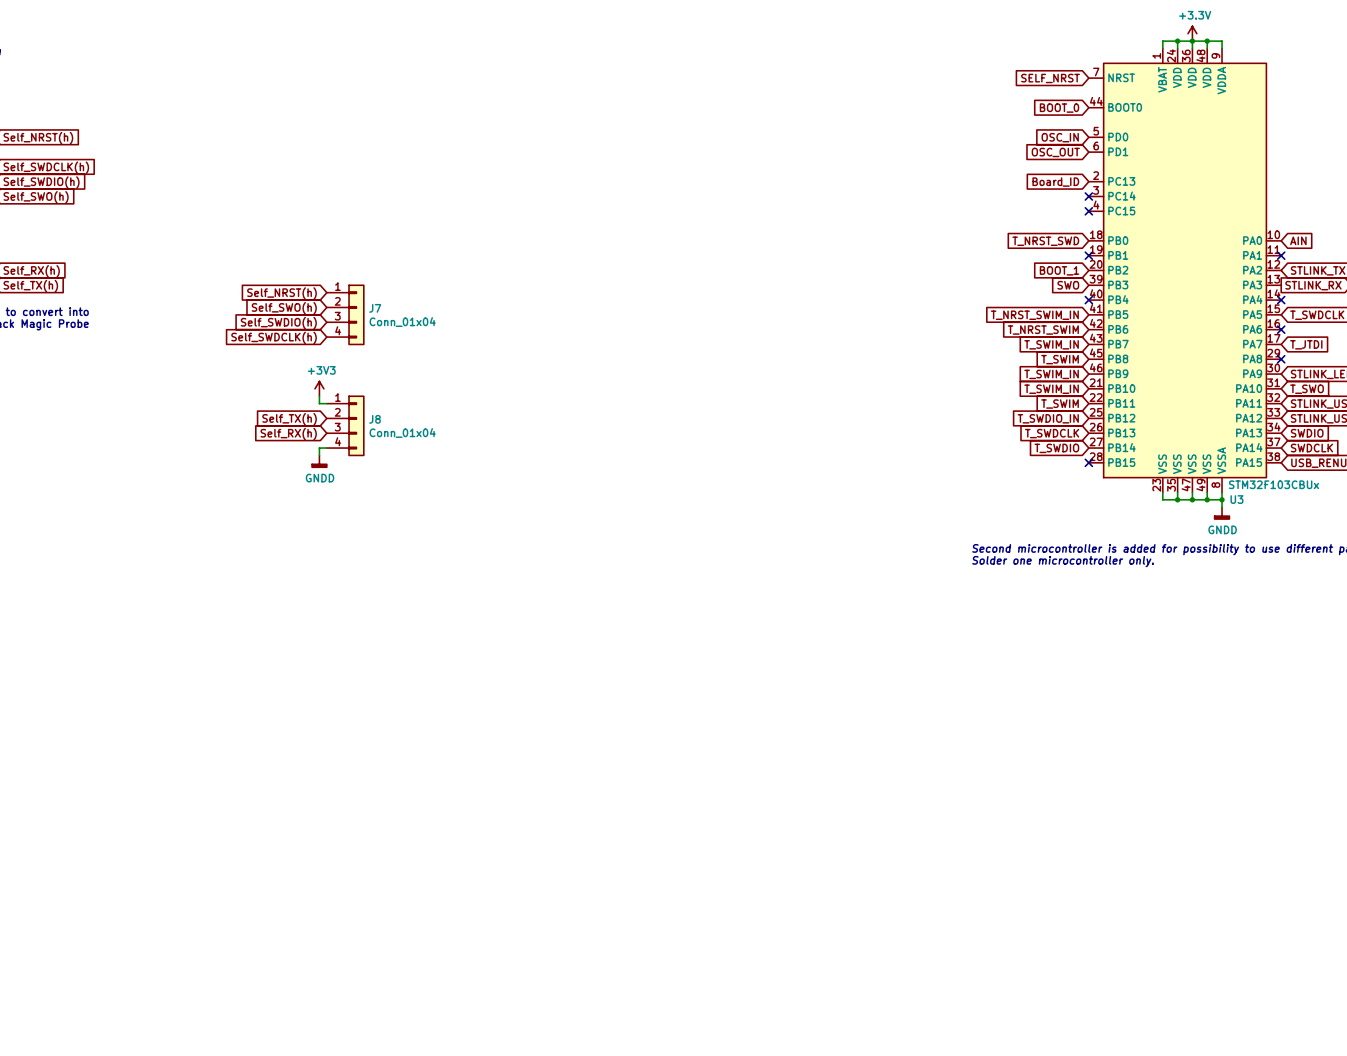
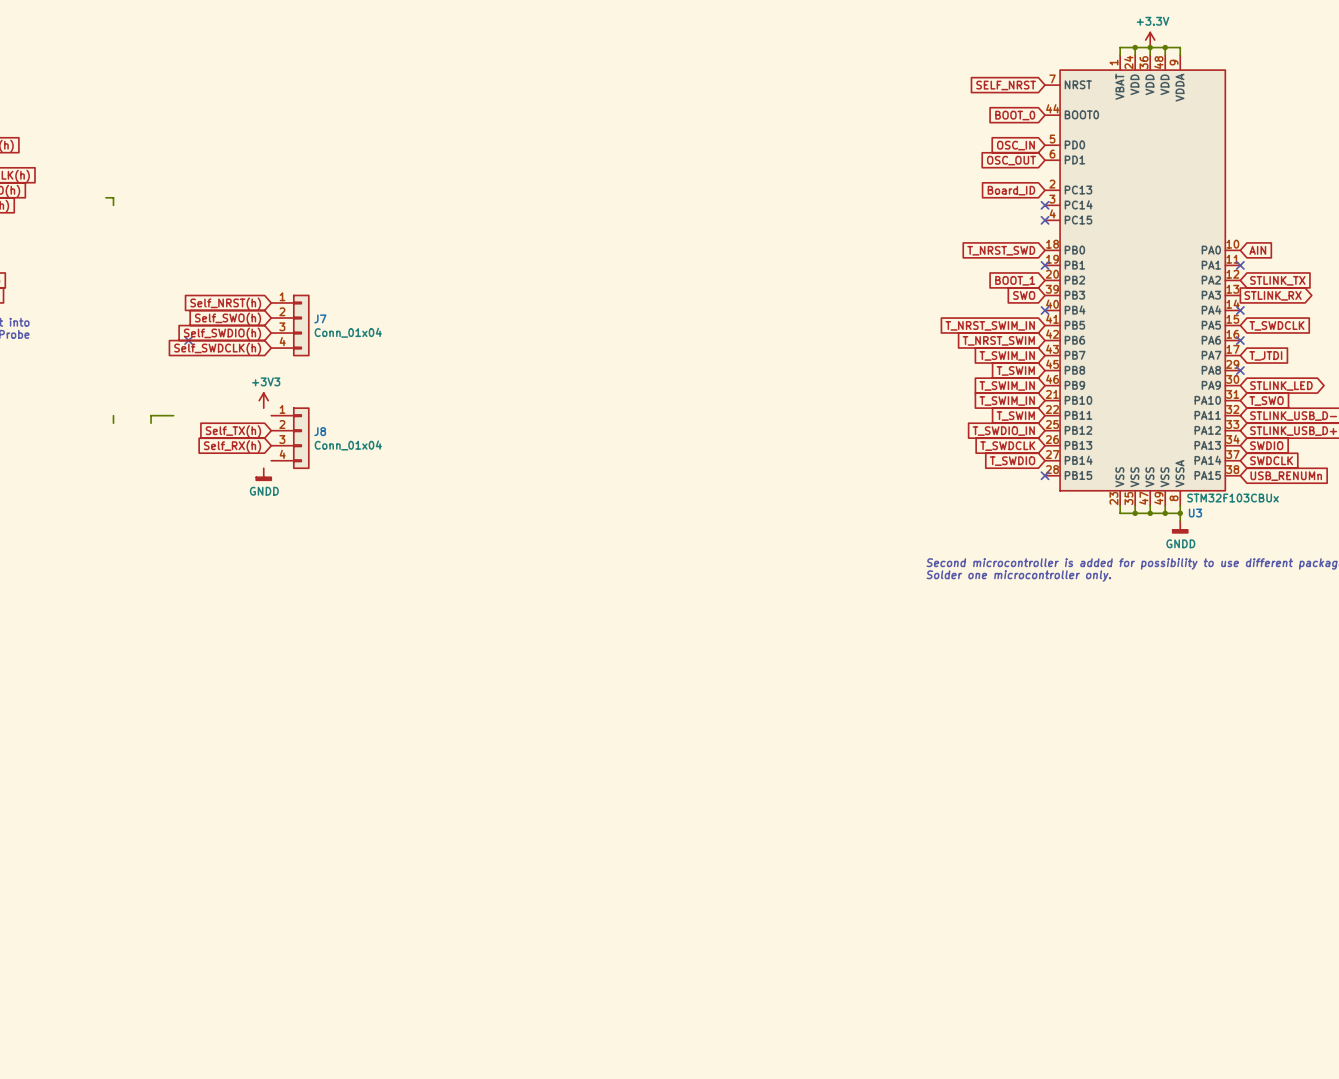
wire: none -> (105, 197) (113, 197) (113, 205)
no-connect mark: none -> (188, 340)
wire: (319, 396) (319, 403) (326, 403) -> none
wire: none -> (113, 415) (113, 423)
wire: none -> (173, 415) (151, 415) (151, 423)
wire: (326, 448) (319, 448) (319, 455) -> none

